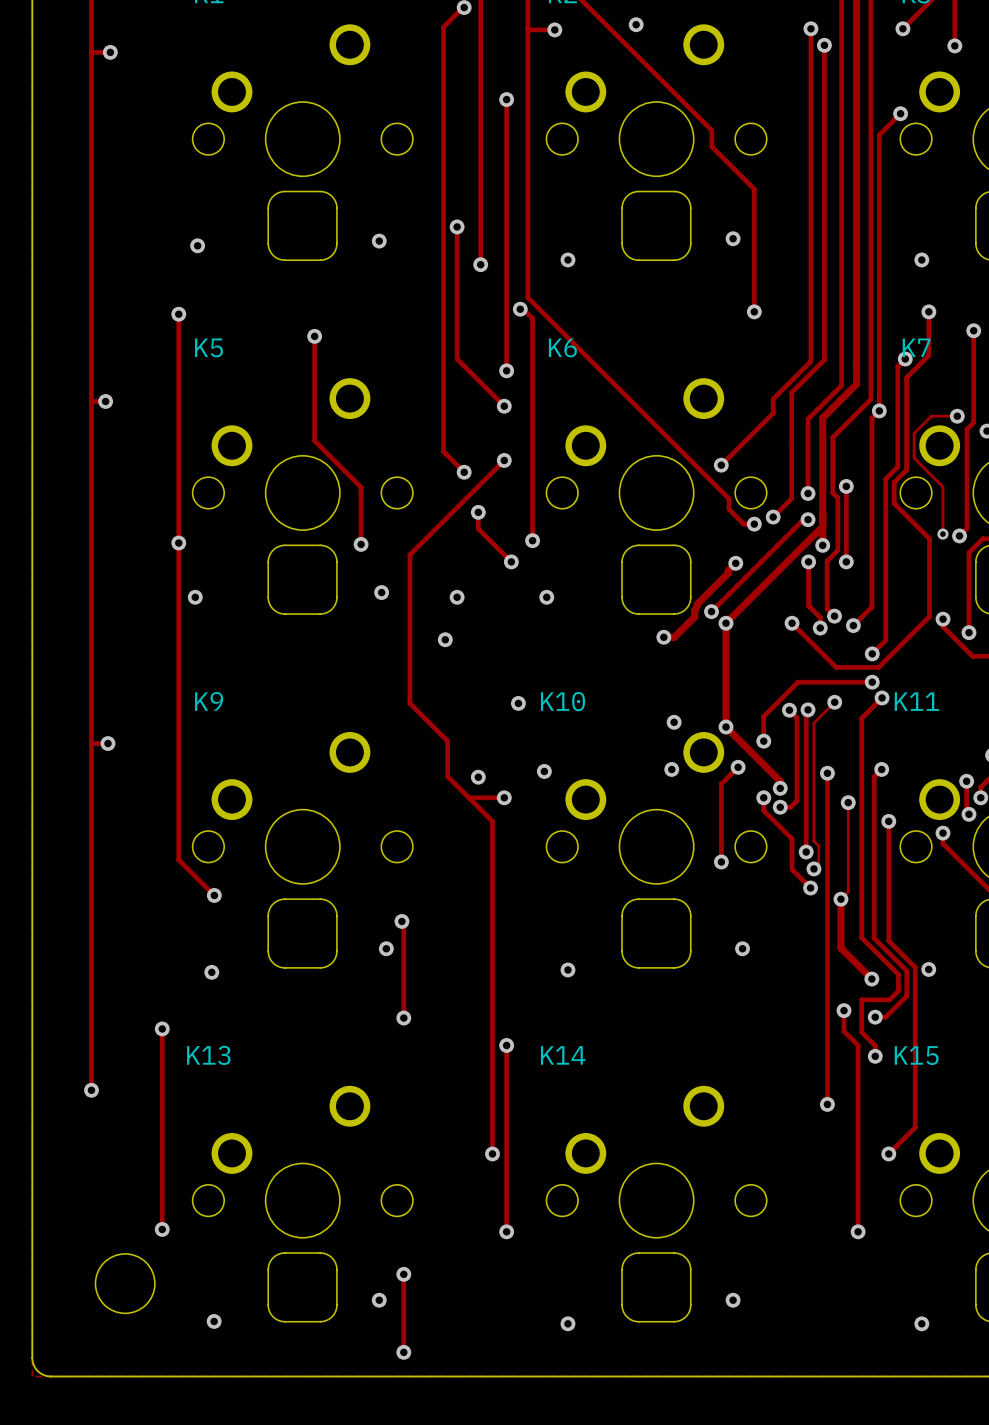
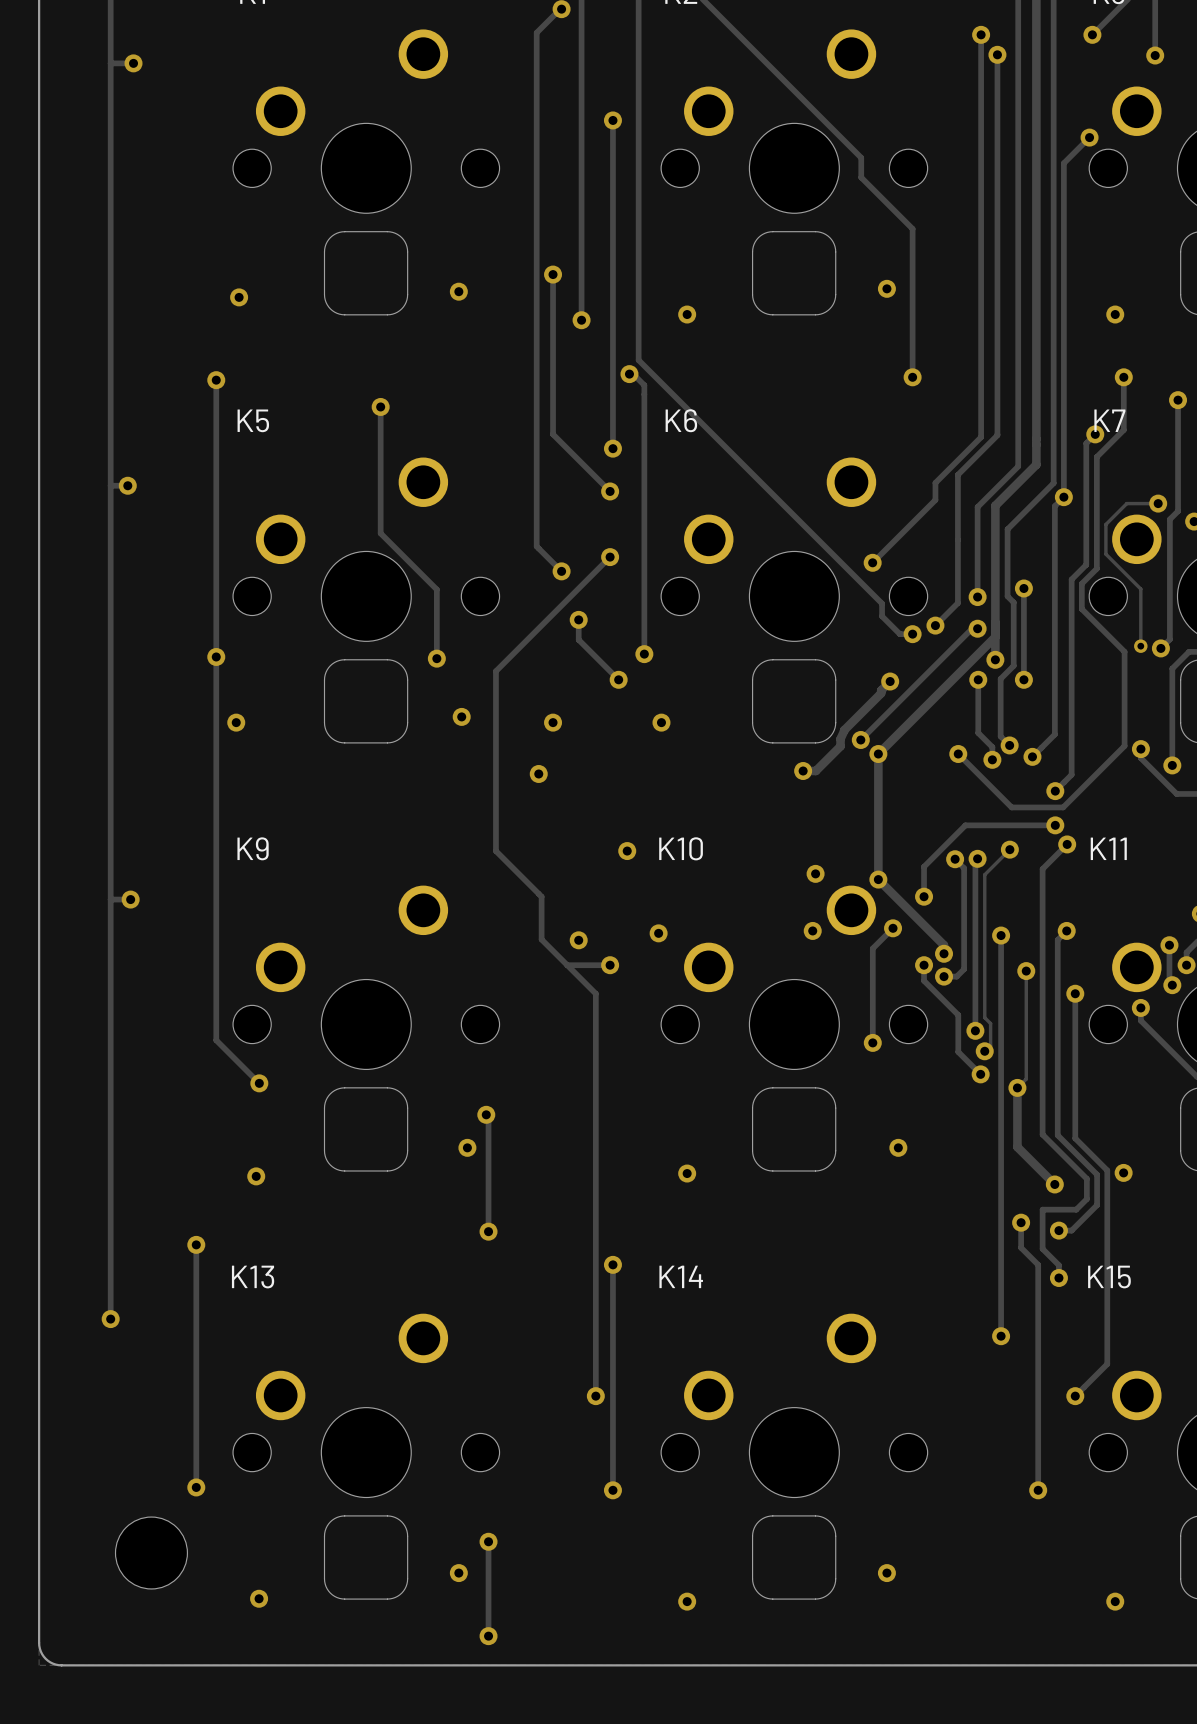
via: (636, 24) -> none
track: (527, 29) (554, 29) -> none
via: (554, 29) -> none

